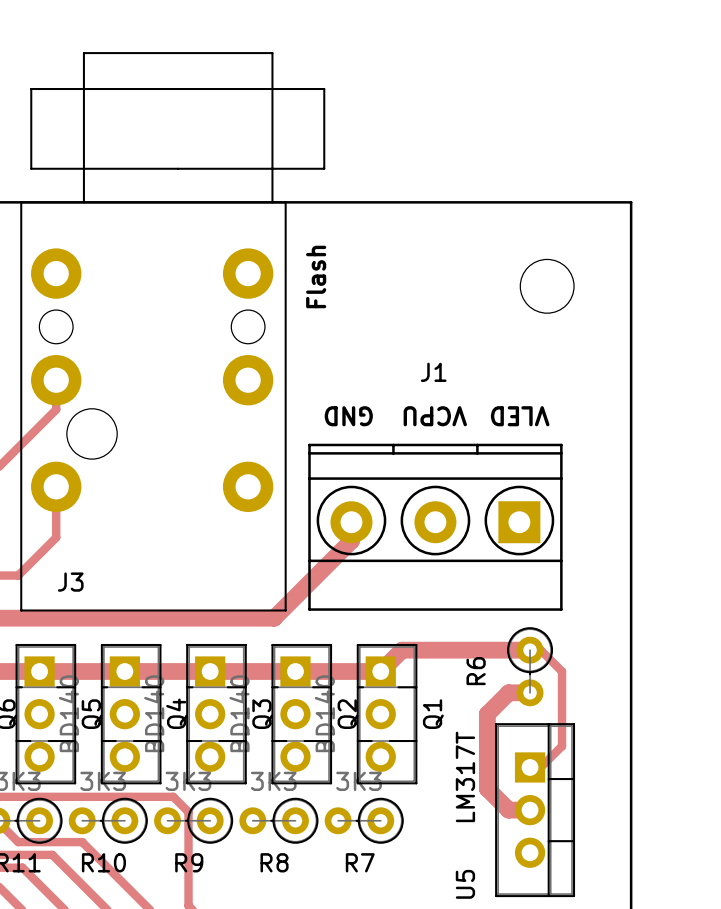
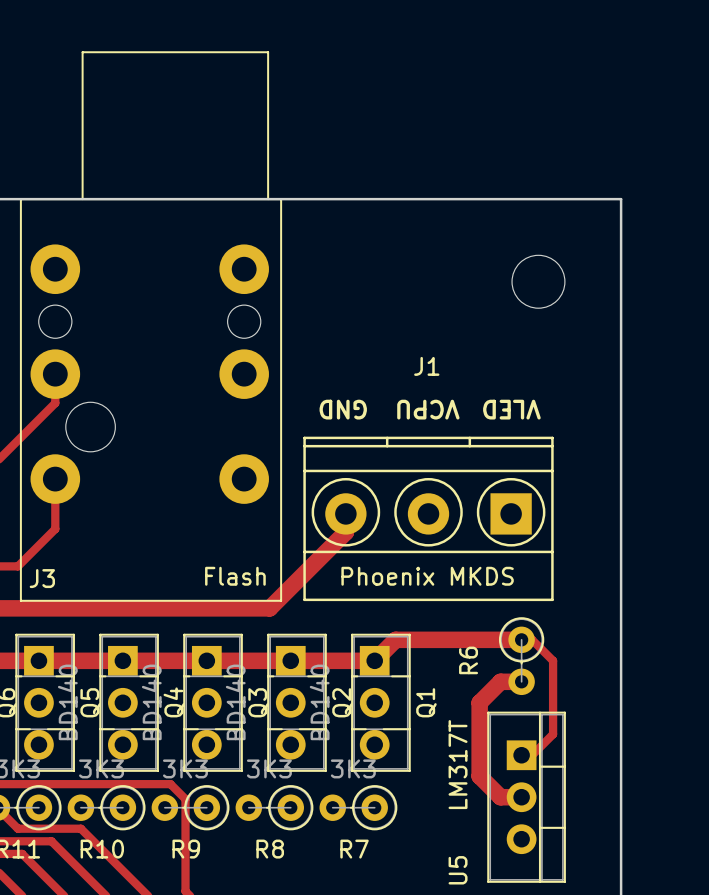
J3 footprint: [20, 52, 326, 612] -> [19, 51, 283, 602]
text: Flash (316, 276) -> none
J3 value: none -> Flash (235, 576)
J1 value: none -> Phoenix MKDS (427, 576)

